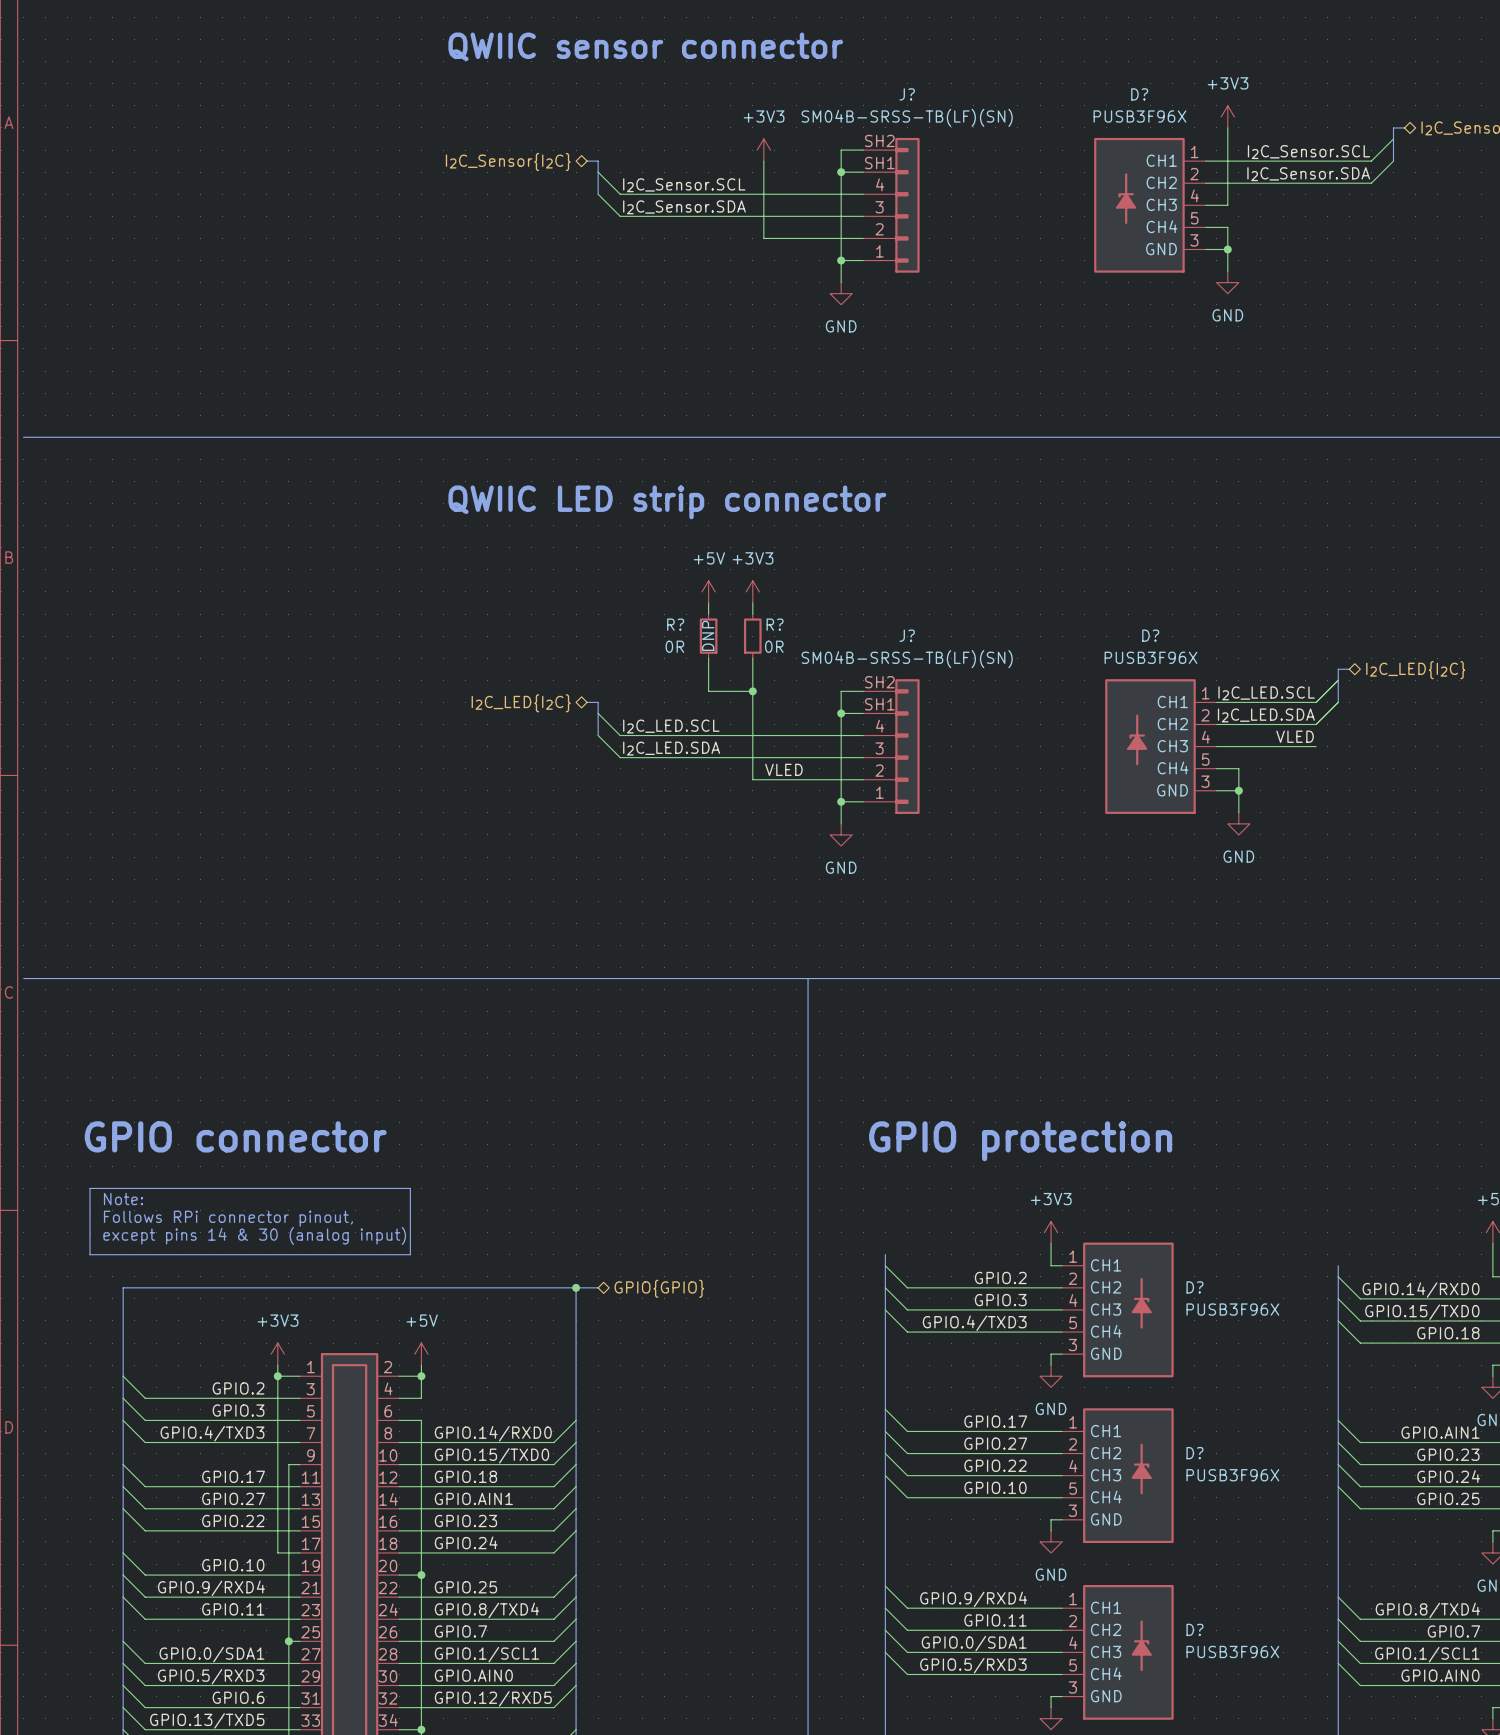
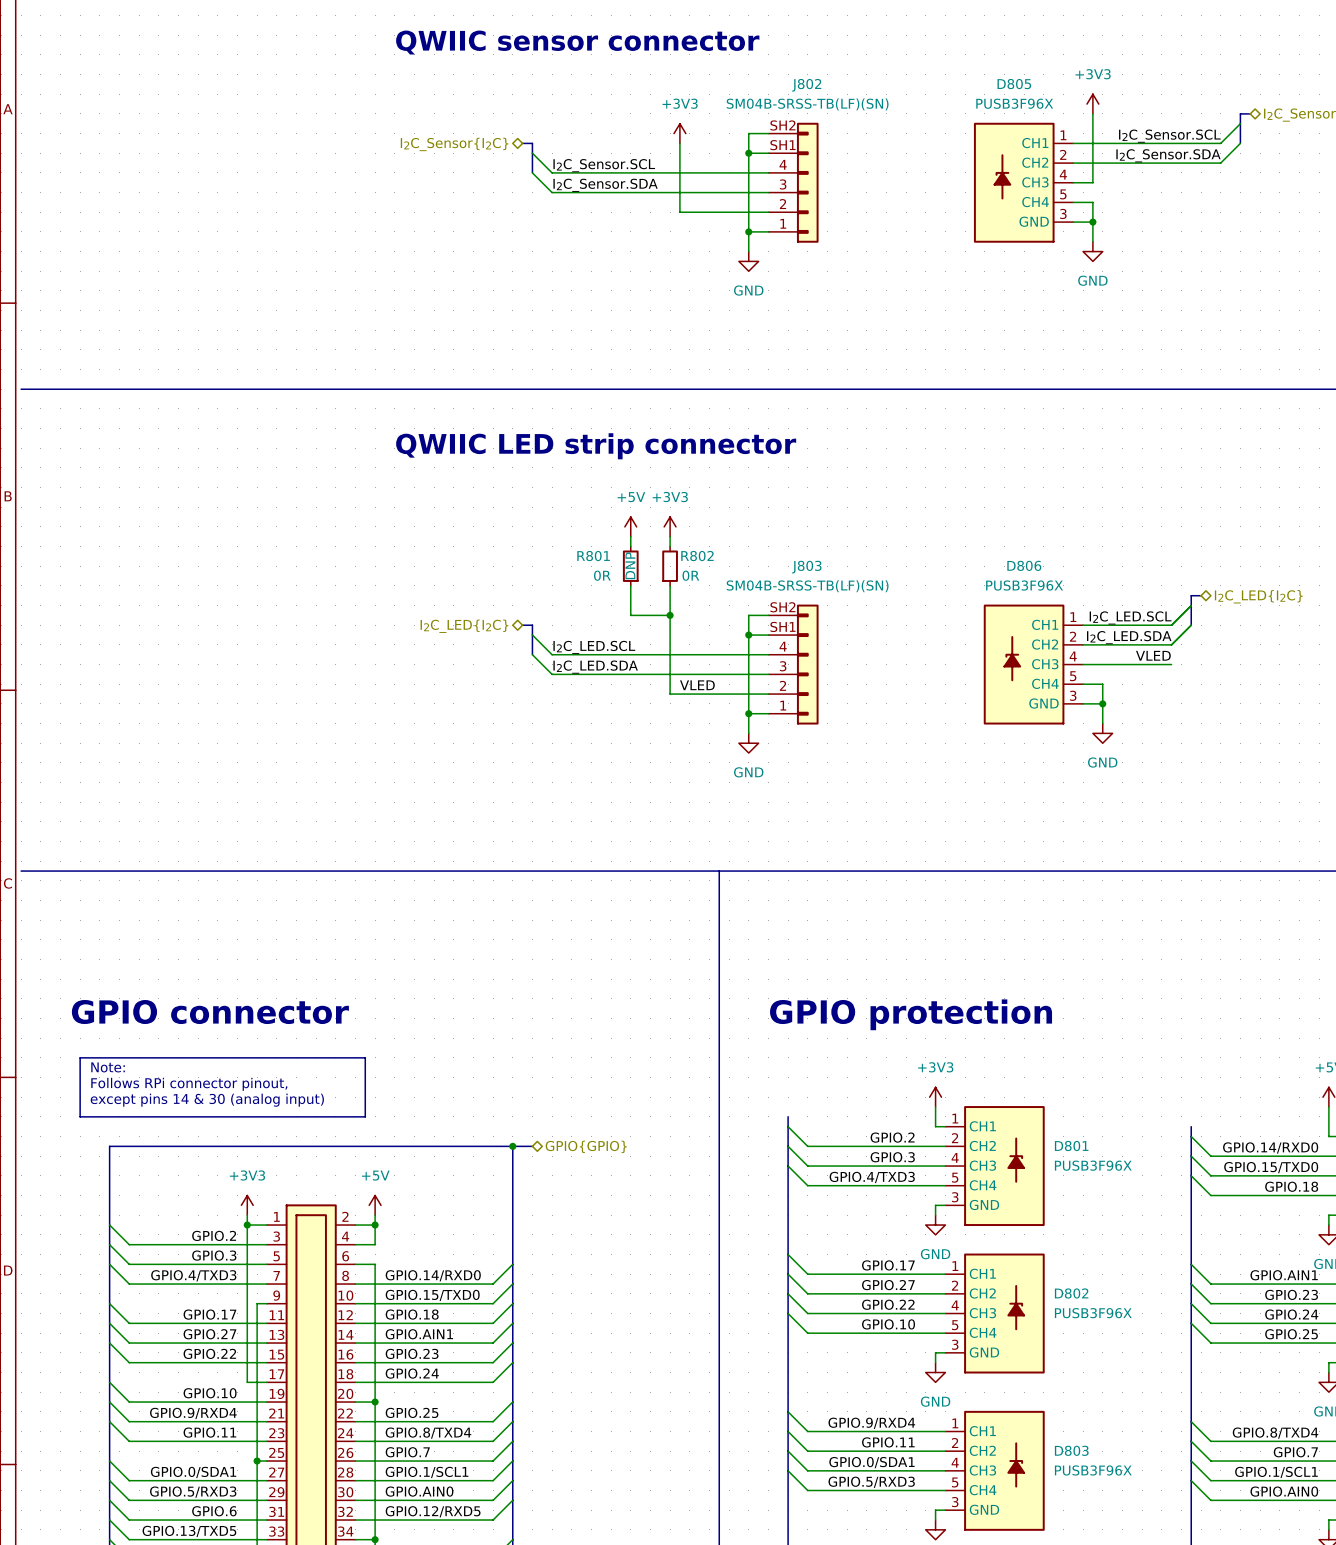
J? name: J? (907, 94) -> J802 (806, 85)
D? name: D? (1139, 94) -> D805 (1014, 84)
R? name: R? (675, 624) -> R801 (593, 556)
R? name: R? (775, 624) -> R802 (697, 556)
J? name: J? (907, 635) -> J803 (806, 567)
D? name: D? (1150, 635) -> D806 (1024, 565)
D? name: D? (1194, 1287) -> D801 (1071, 1146)
D? name: D? (1194, 1453) -> D802 (1071, 1293)
D? name: D? (1194, 1629) -> D803 (1071, 1450)

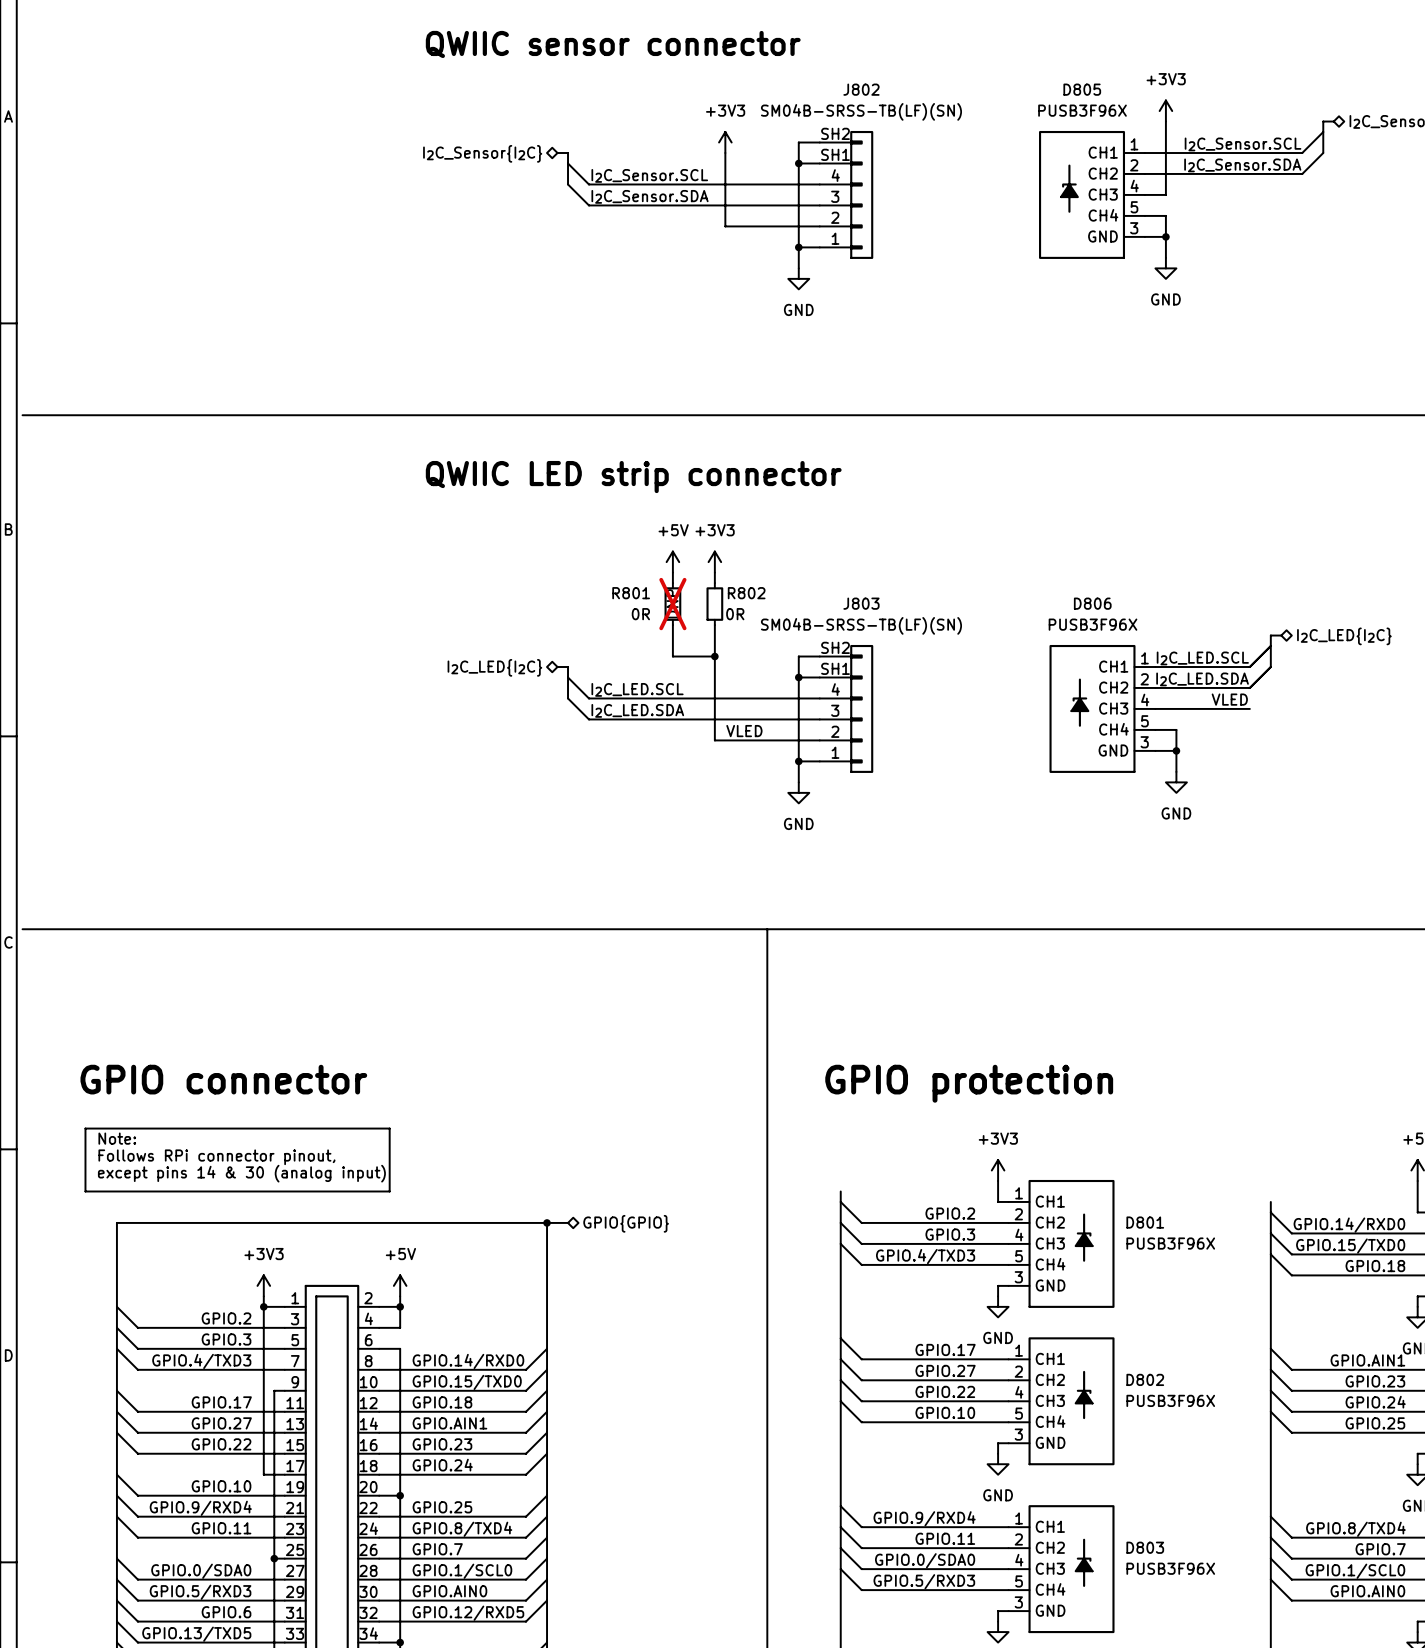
R801 do-not-place cross: none -> (672, 604)
label: GPIO.0/SDA1 (871, 1462) -> GPIO.0/SDA0 (925, 1560)
label: GPIO.0/SDA1 (193, 1472) -> GPIO.0/SDA0 (201, 1571)
label: GPIO.1/SCL1 (427, 1472) -> GPIO.1/SCL0 (462, 1571)
label: GPIO.1/SCL1 (1276, 1472) -> GPIO.1/SCL0 (1355, 1571)

